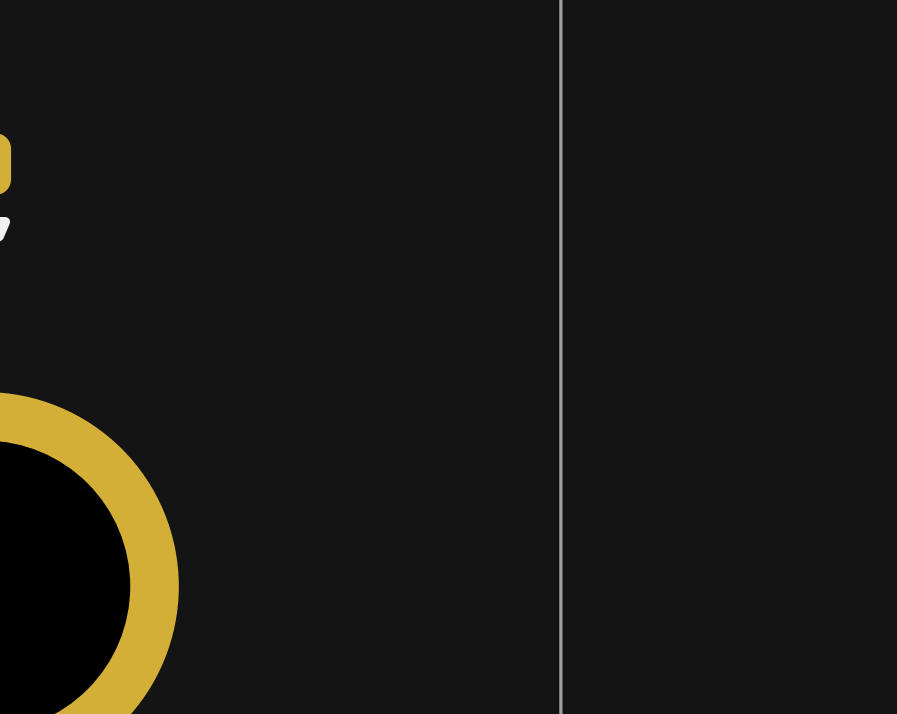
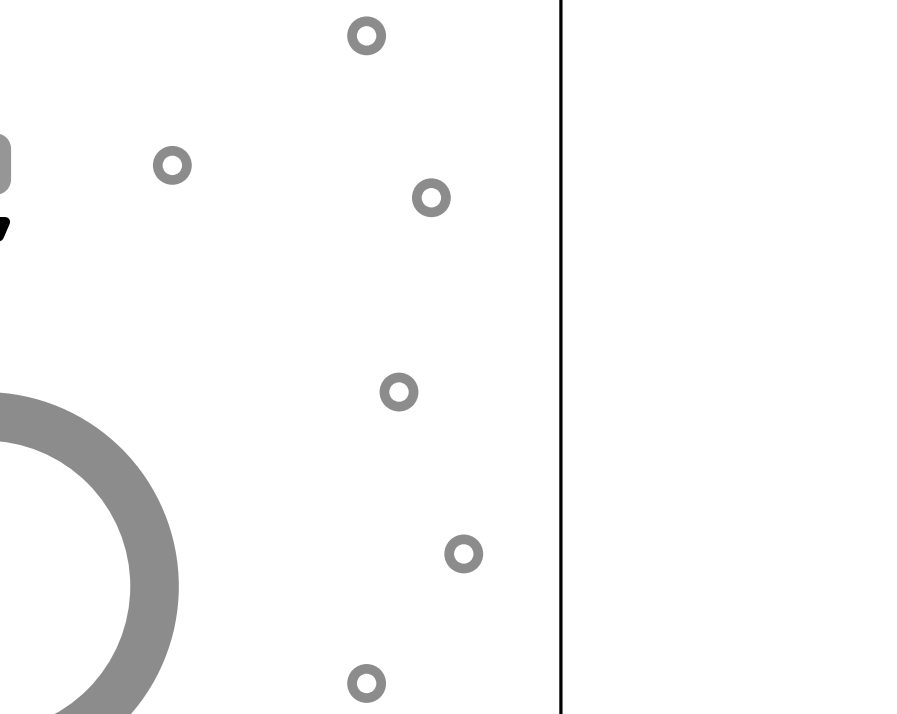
via: none -> (366, 35)
via: none -> (172, 165)
via: none -> (431, 197)
via: none -> (399, 392)
via: none -> (463, 553)
via: none -> (366, 683)

